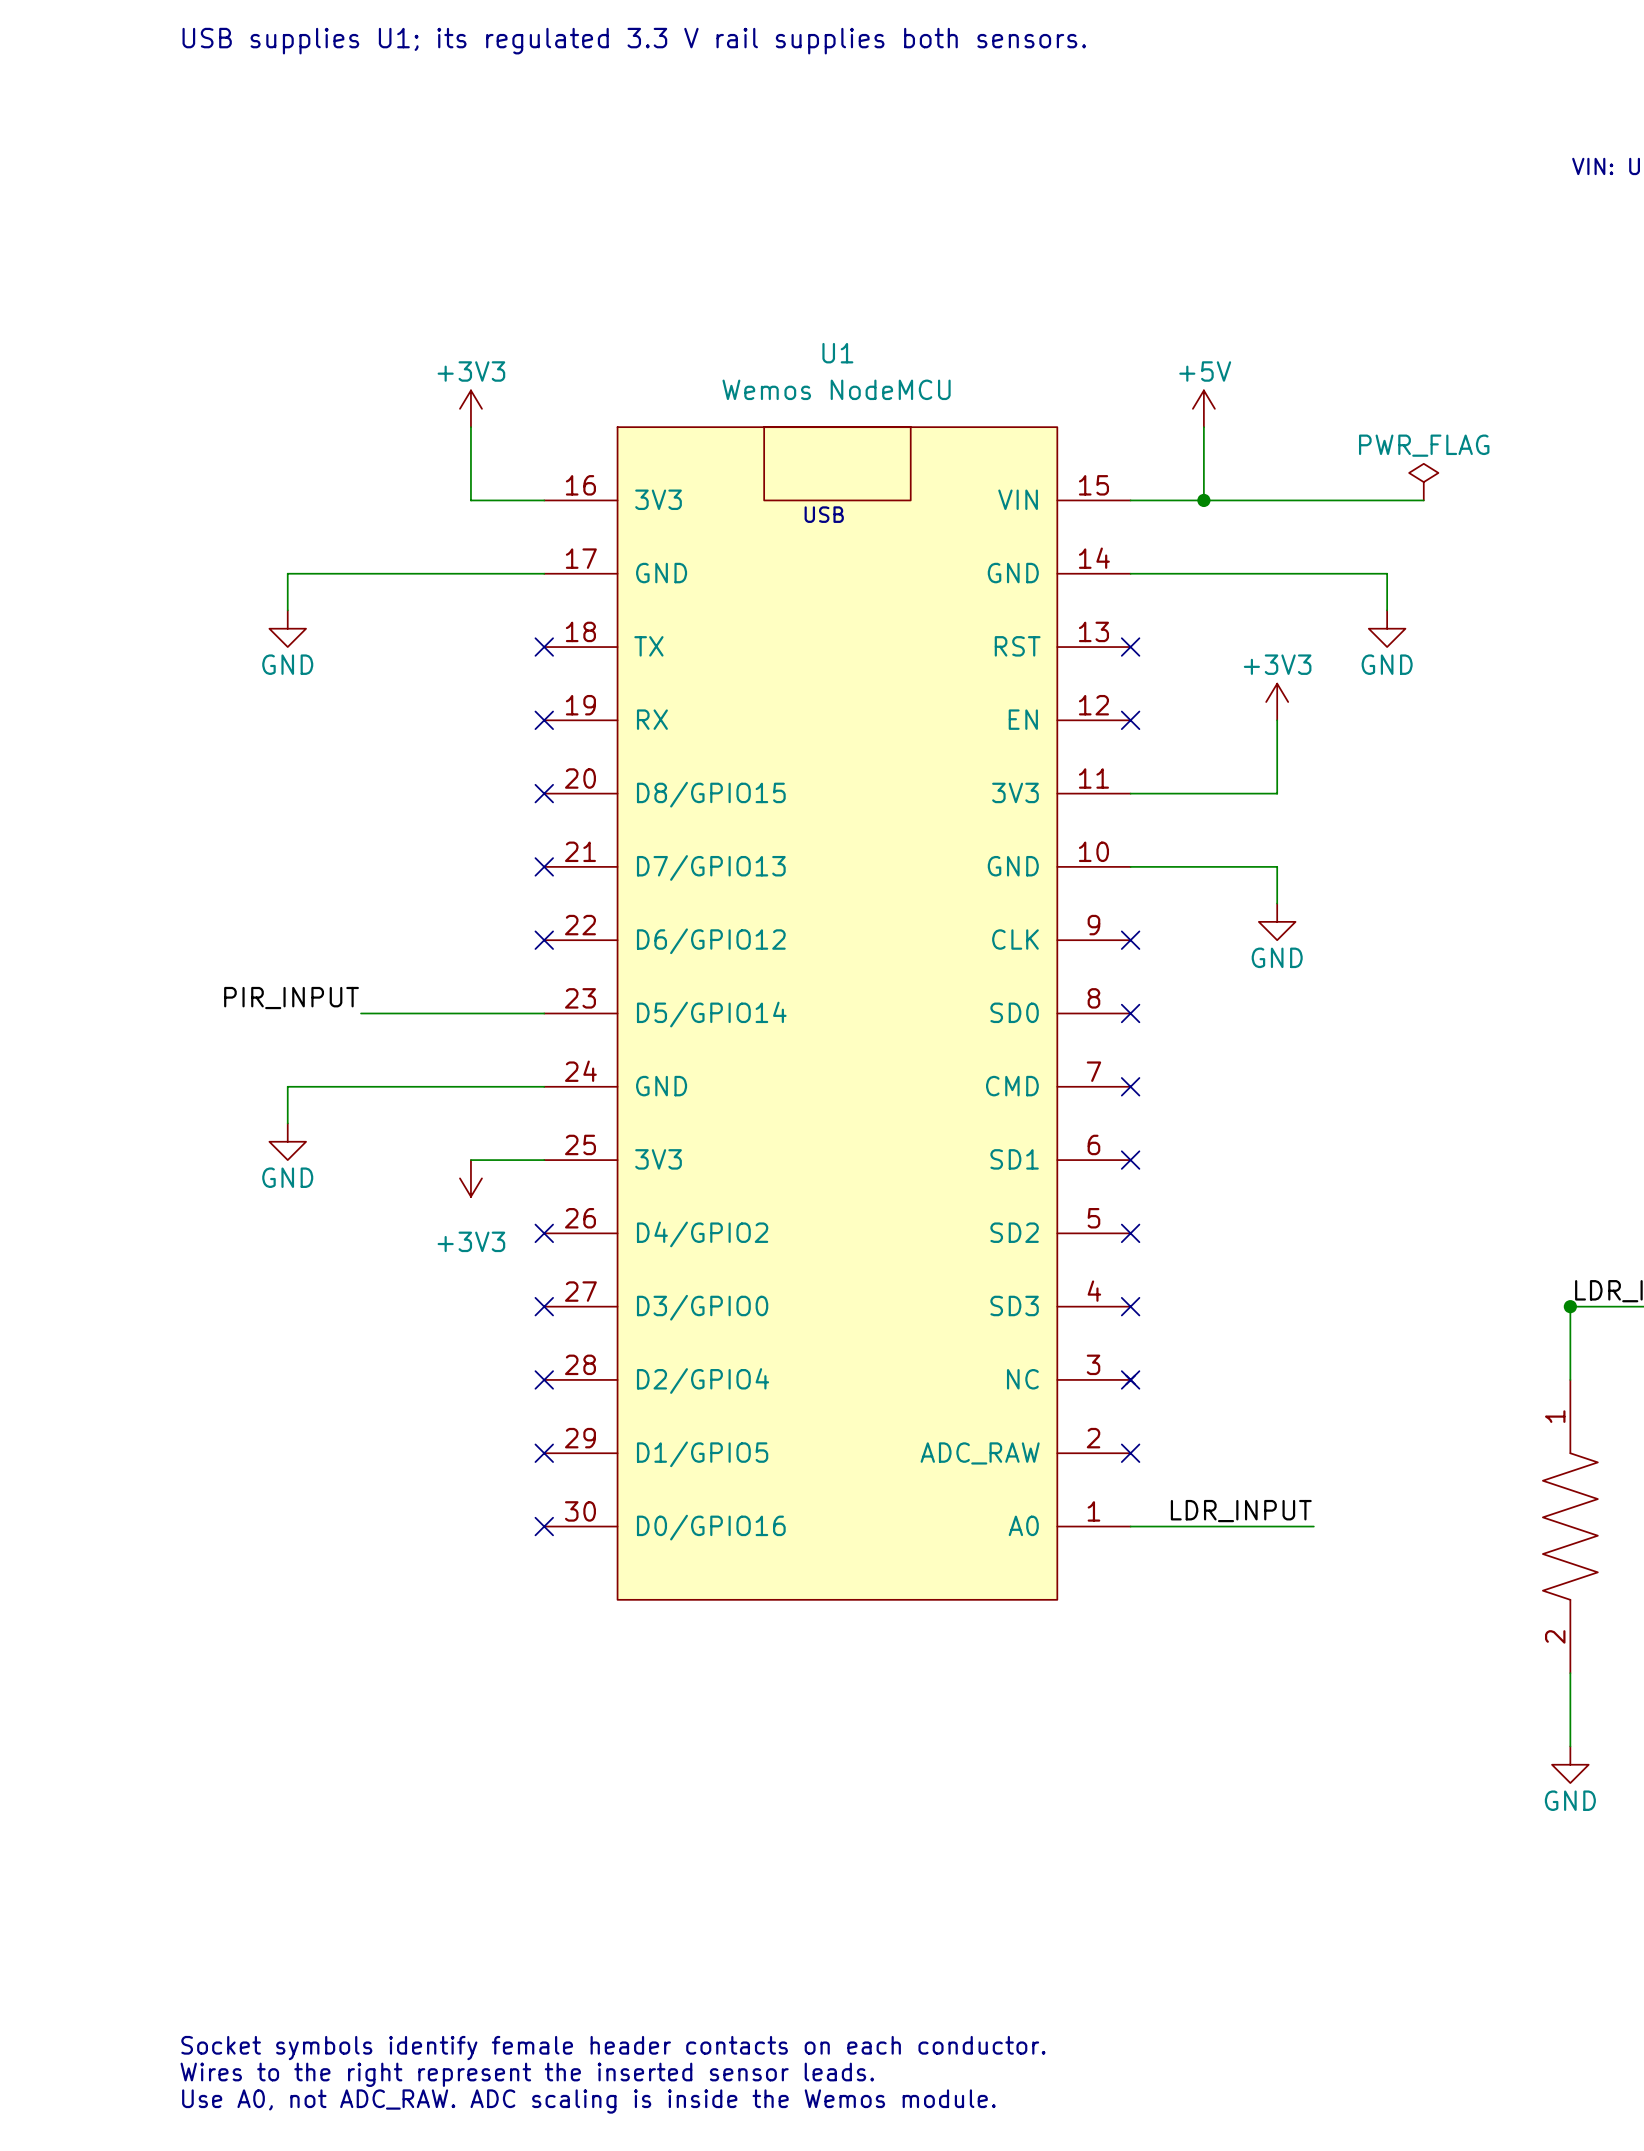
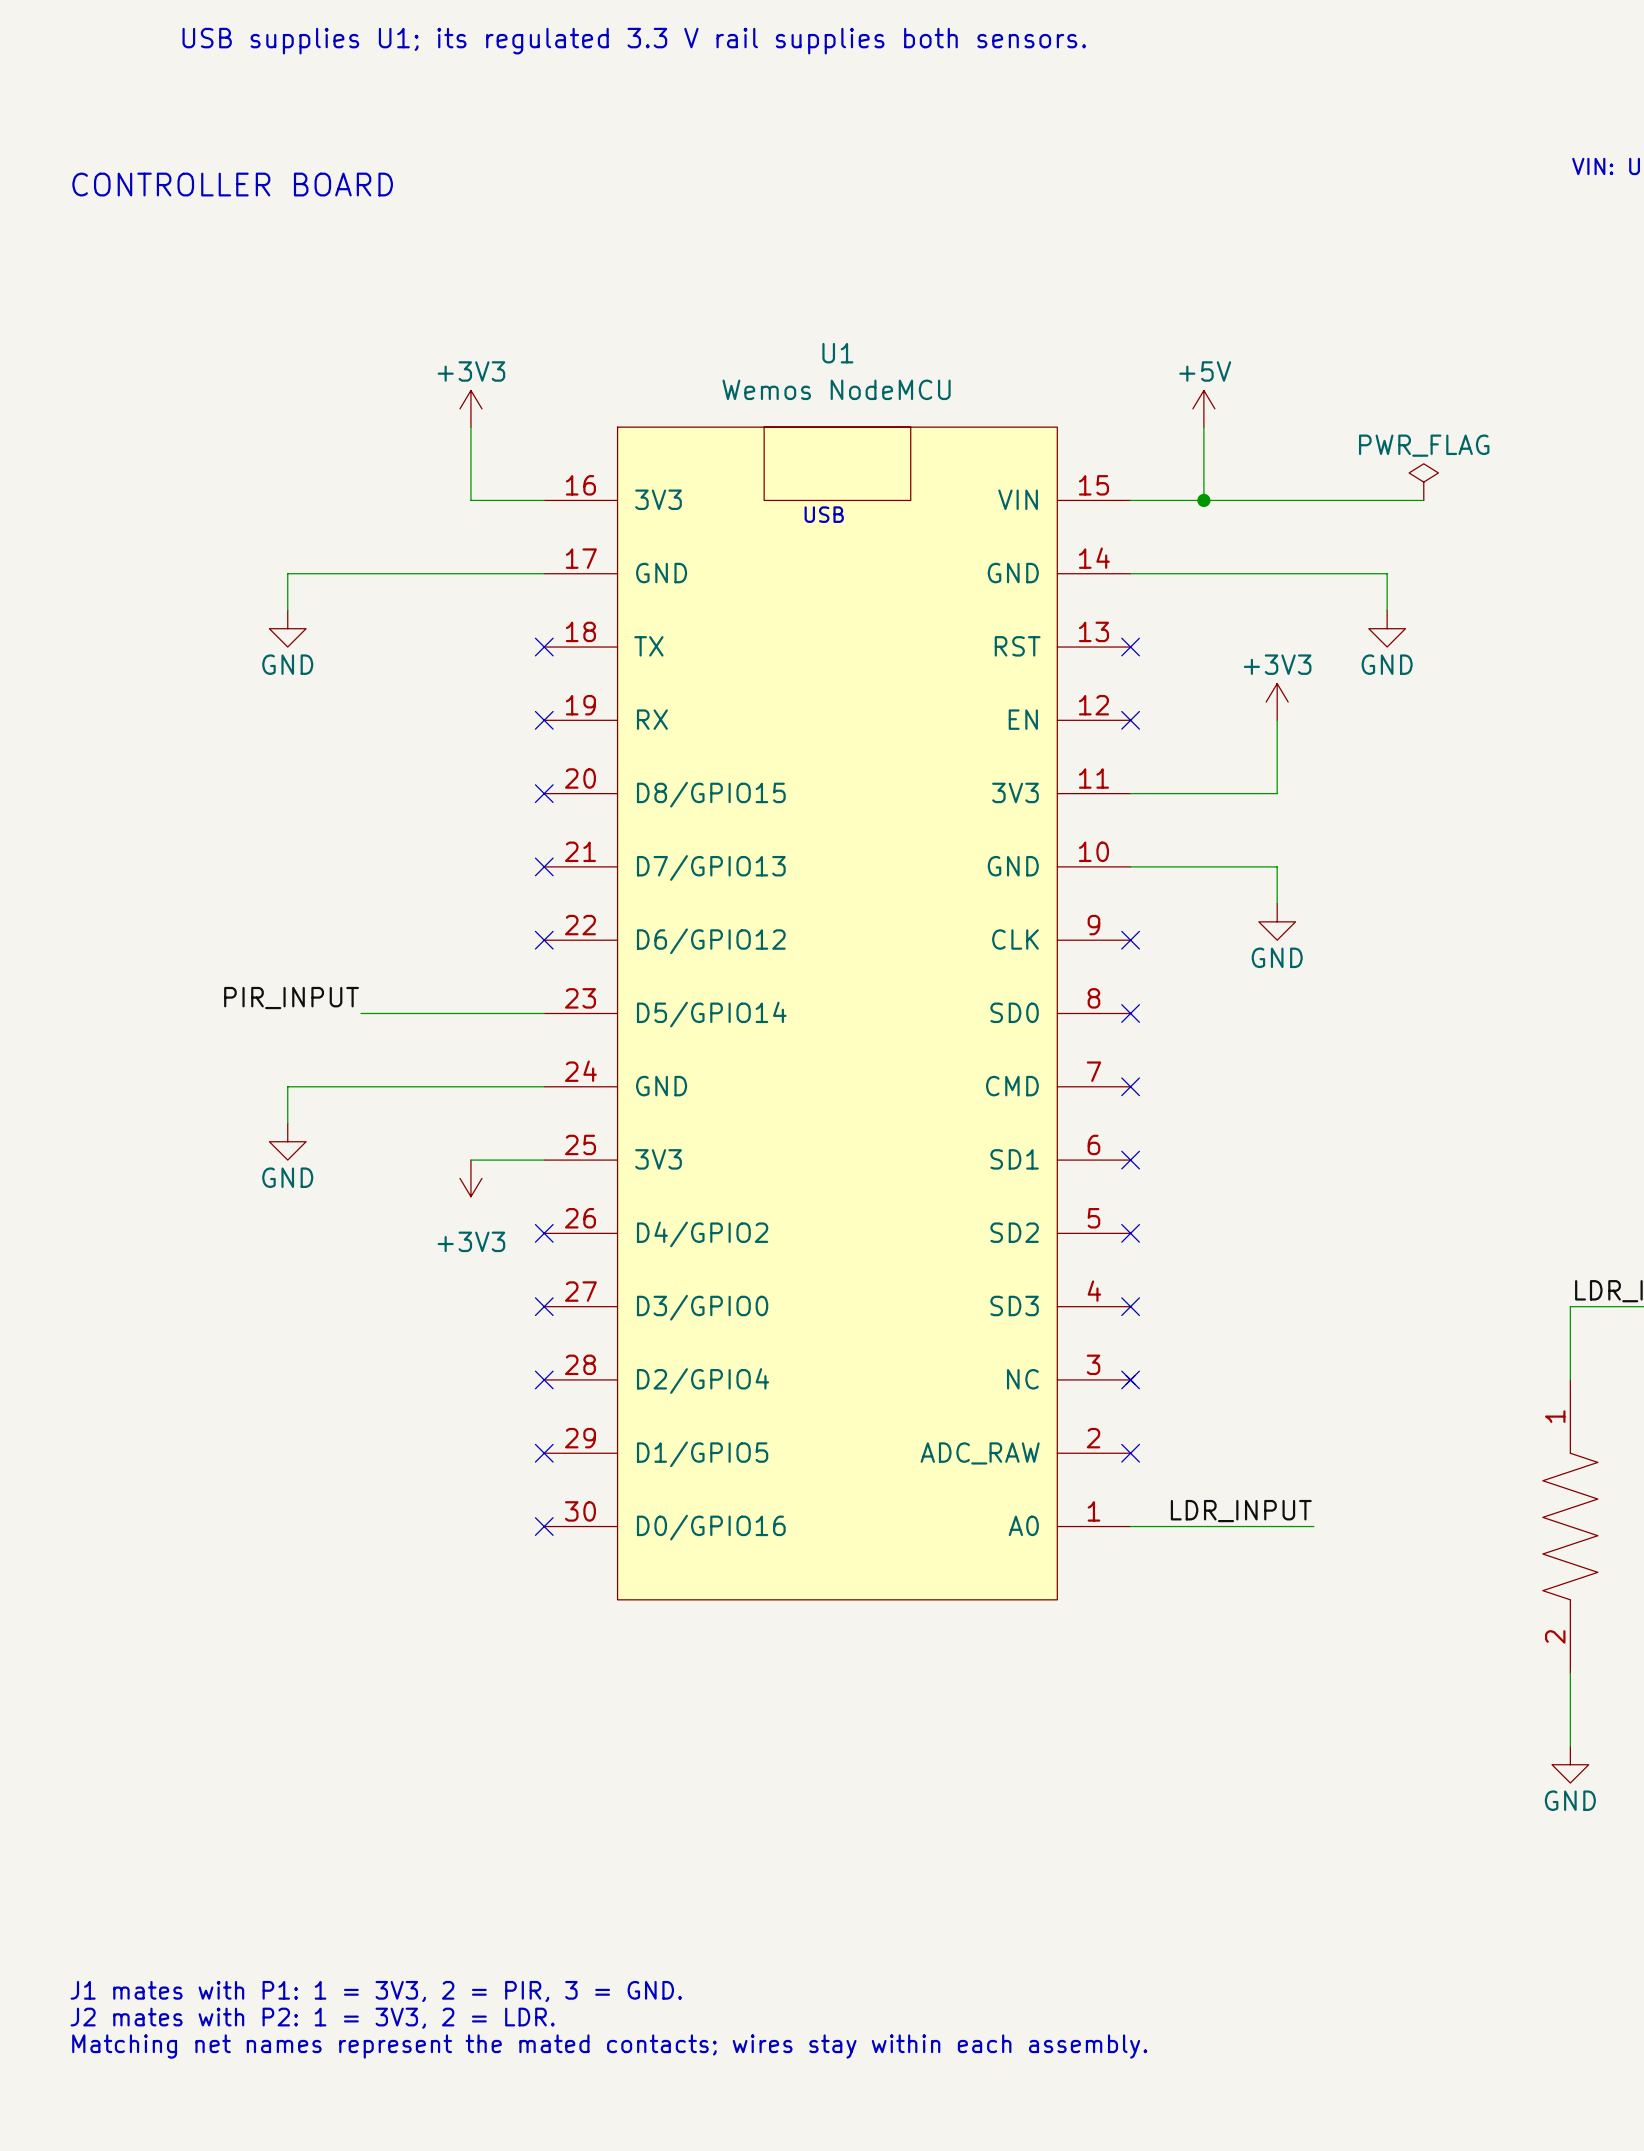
text: none -> CONTROLLER BOARD (232, 184)
junction: (1570, 1306) -> none
text: none -> J1 mates with P1: 1 = 3V3, 2 = PIR, 3 = GND. (376, 1991)
text: none -> J2 mates with P2: 1 = 3V3, 2 = LDR. (312, 2018)
text: none -> Matching net names represent the mated contacts; wires stay within each assembly. (609, 2046)
text: Socket symbols identify female header contacts on each conductor. (613, 2048) -> none
text: Wires to the right represent the inserted sensor leads. (527, 2074) -> none
text: Use A0, not ADC_RAW. ADC scaling is inside the Wemos module. (588, 2101) -> none

